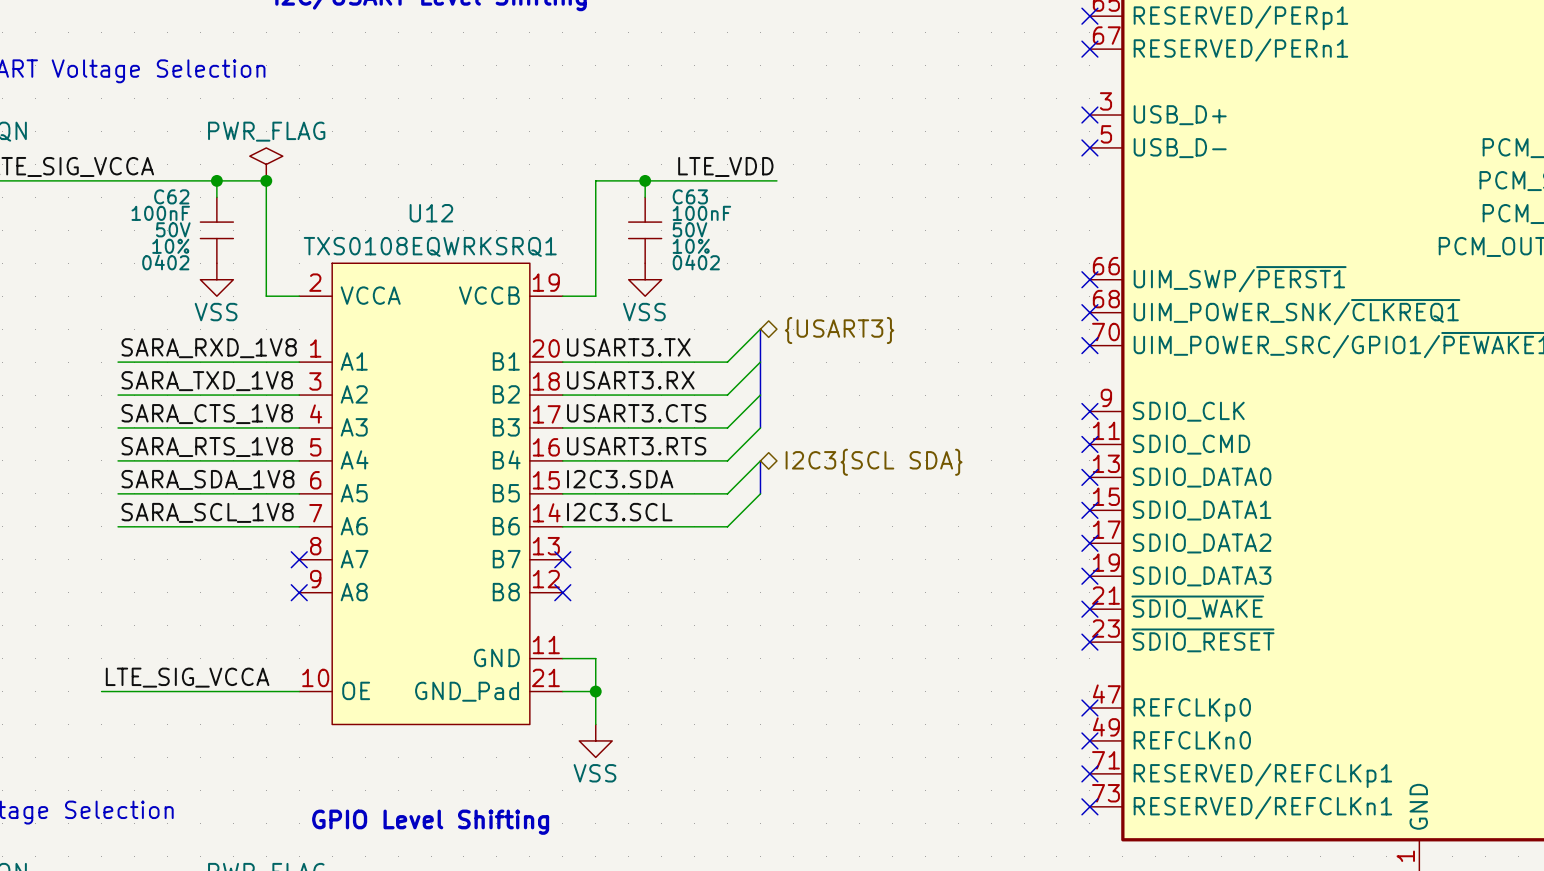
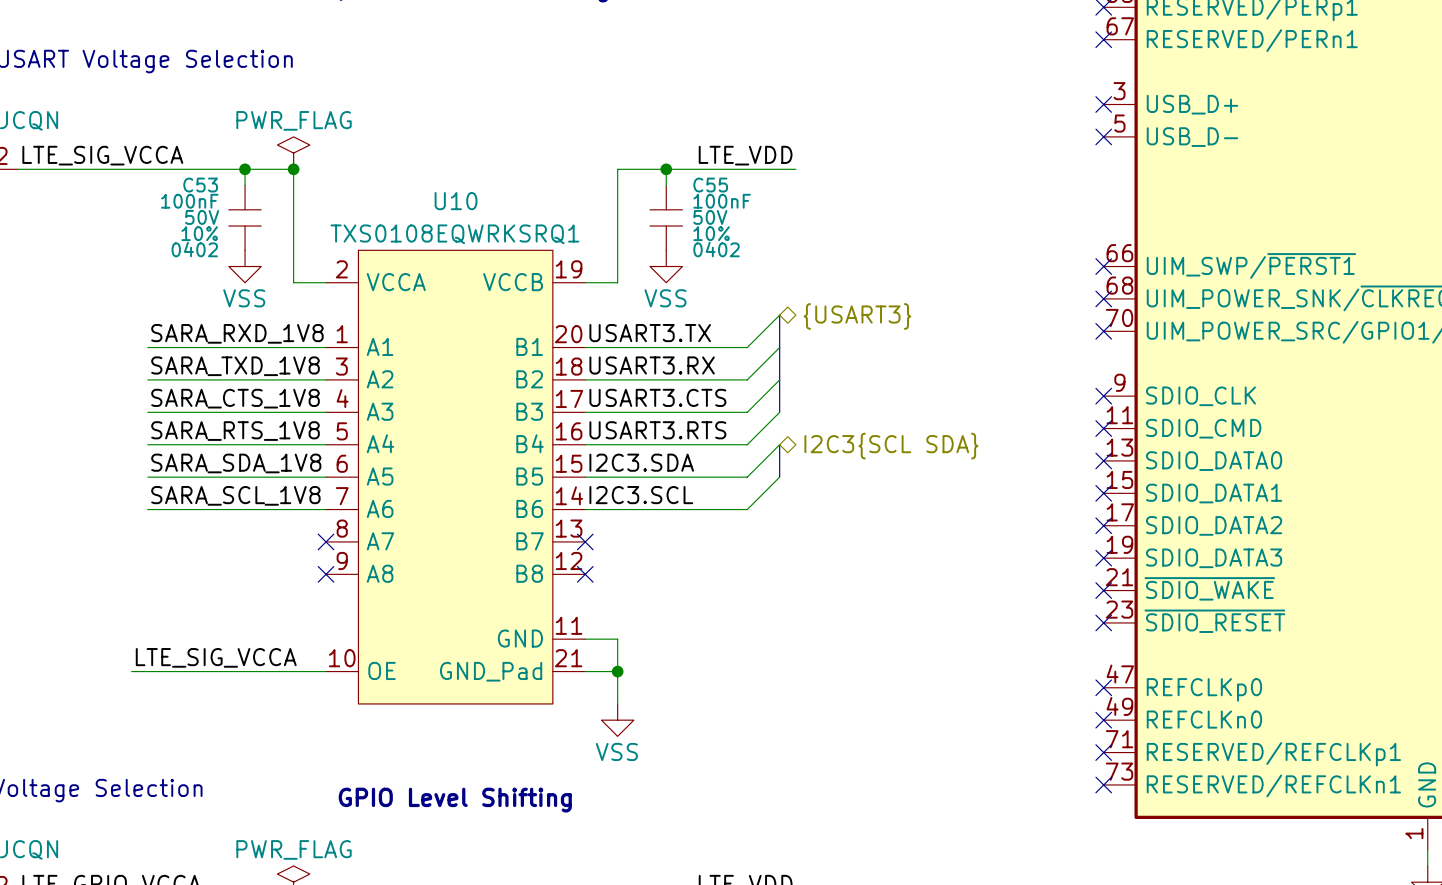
C62 name: C62 (171, 196) -> C53 (200, 185)
C63 name: C63 (690, 196) -> C55 (710, 185)
U12 name: U12 (431, 213) -> U10 (456, 201)

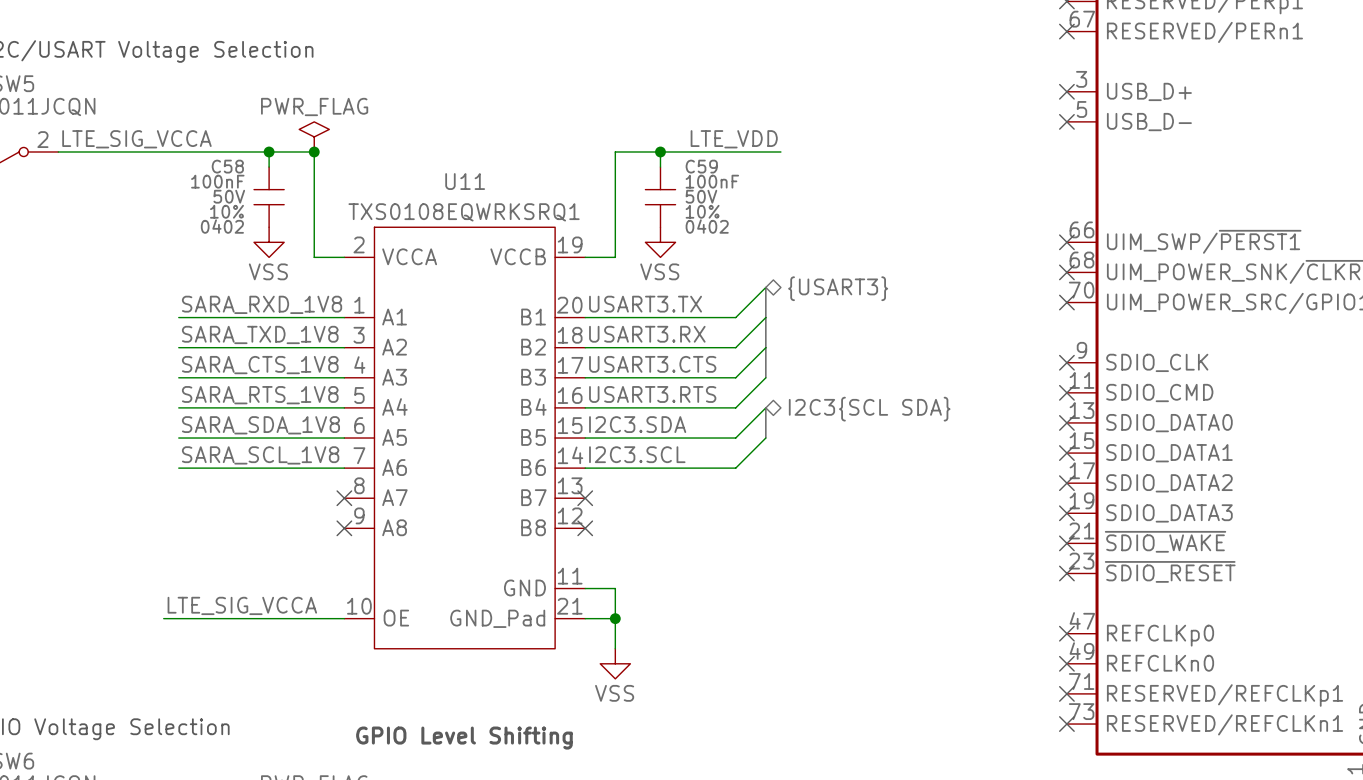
C53 name: C53 (200, 185) -> C58 (227, 166)
C55 name: C55 (710, 185) -> C59 (701, 166)
U10 name: U10 (456, 201) -> U11 (465, 181)

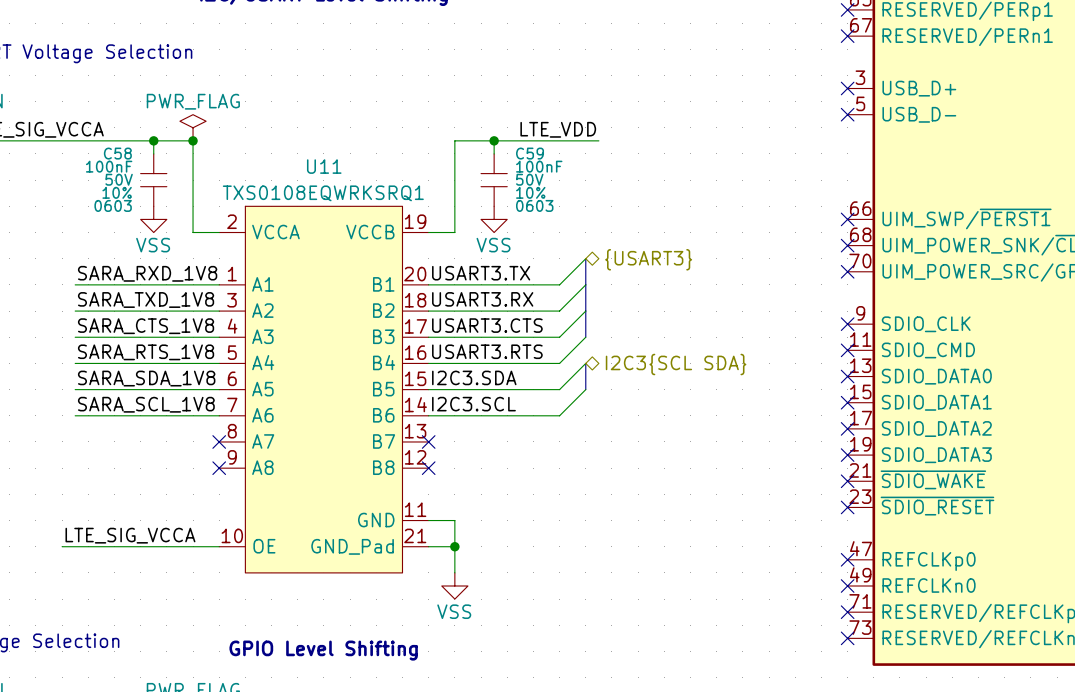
C58 text: 0402 (222, 226) -> 0603 (113, 205)
C59 text: 0402 (707, 226) -> 0603 (534, 205)

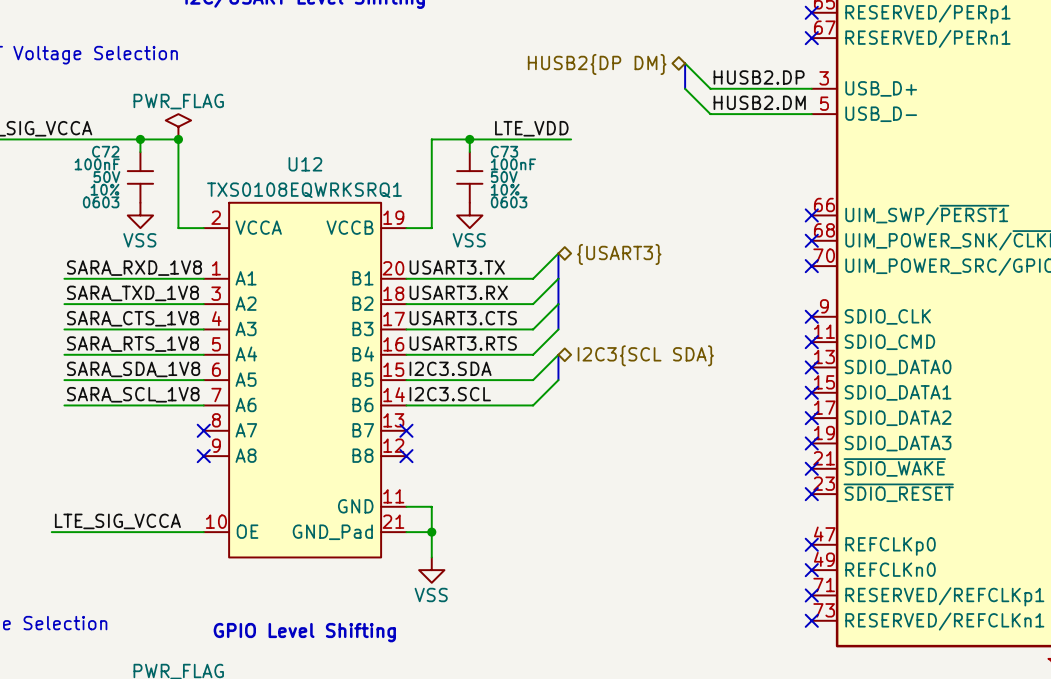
wire: none -> (685, 63) (710, 88) (811, 88)
bus: none -> (685, 63) (685, 88)
hierarchical label: none -> HUSB2{DP DM} (597, 64)
label: none -> HUSB2.DP (759, 77)
wire: none -> (685, 88) (710, 114) (811, 114)
no-connect mark: (847, 88) -> none
label: none -> HUSB2.DM (759, 102)
no-connect mark: (847, 114) -> none
C58 name: C58 (117, 153) -> C72 (105, 151)
C59 name: C59 (530, 153) -> C73 (504, 151)
U11 name: U11 (324, 166) -> U12 (305, 164)

